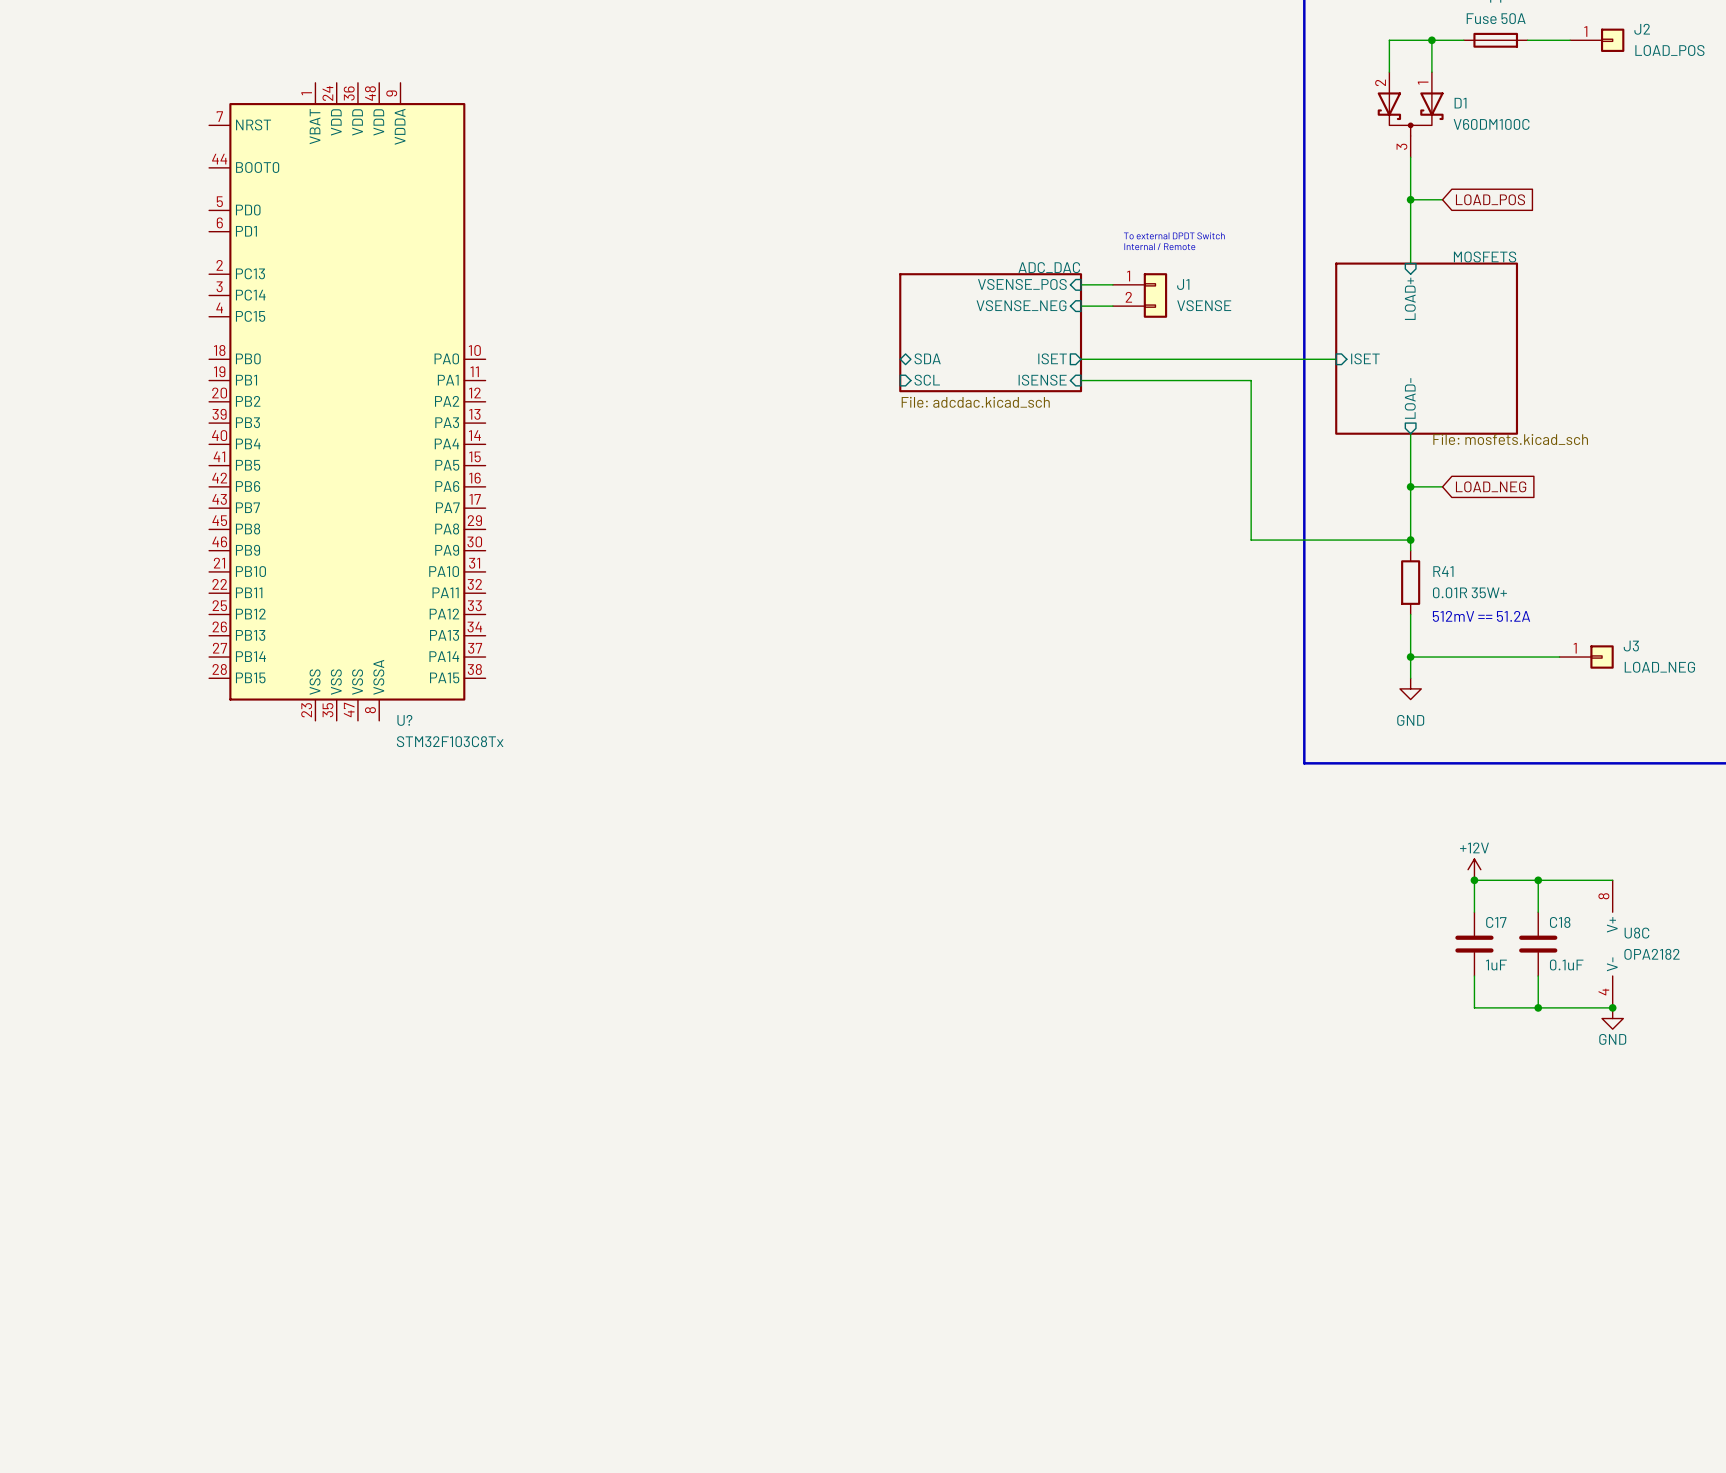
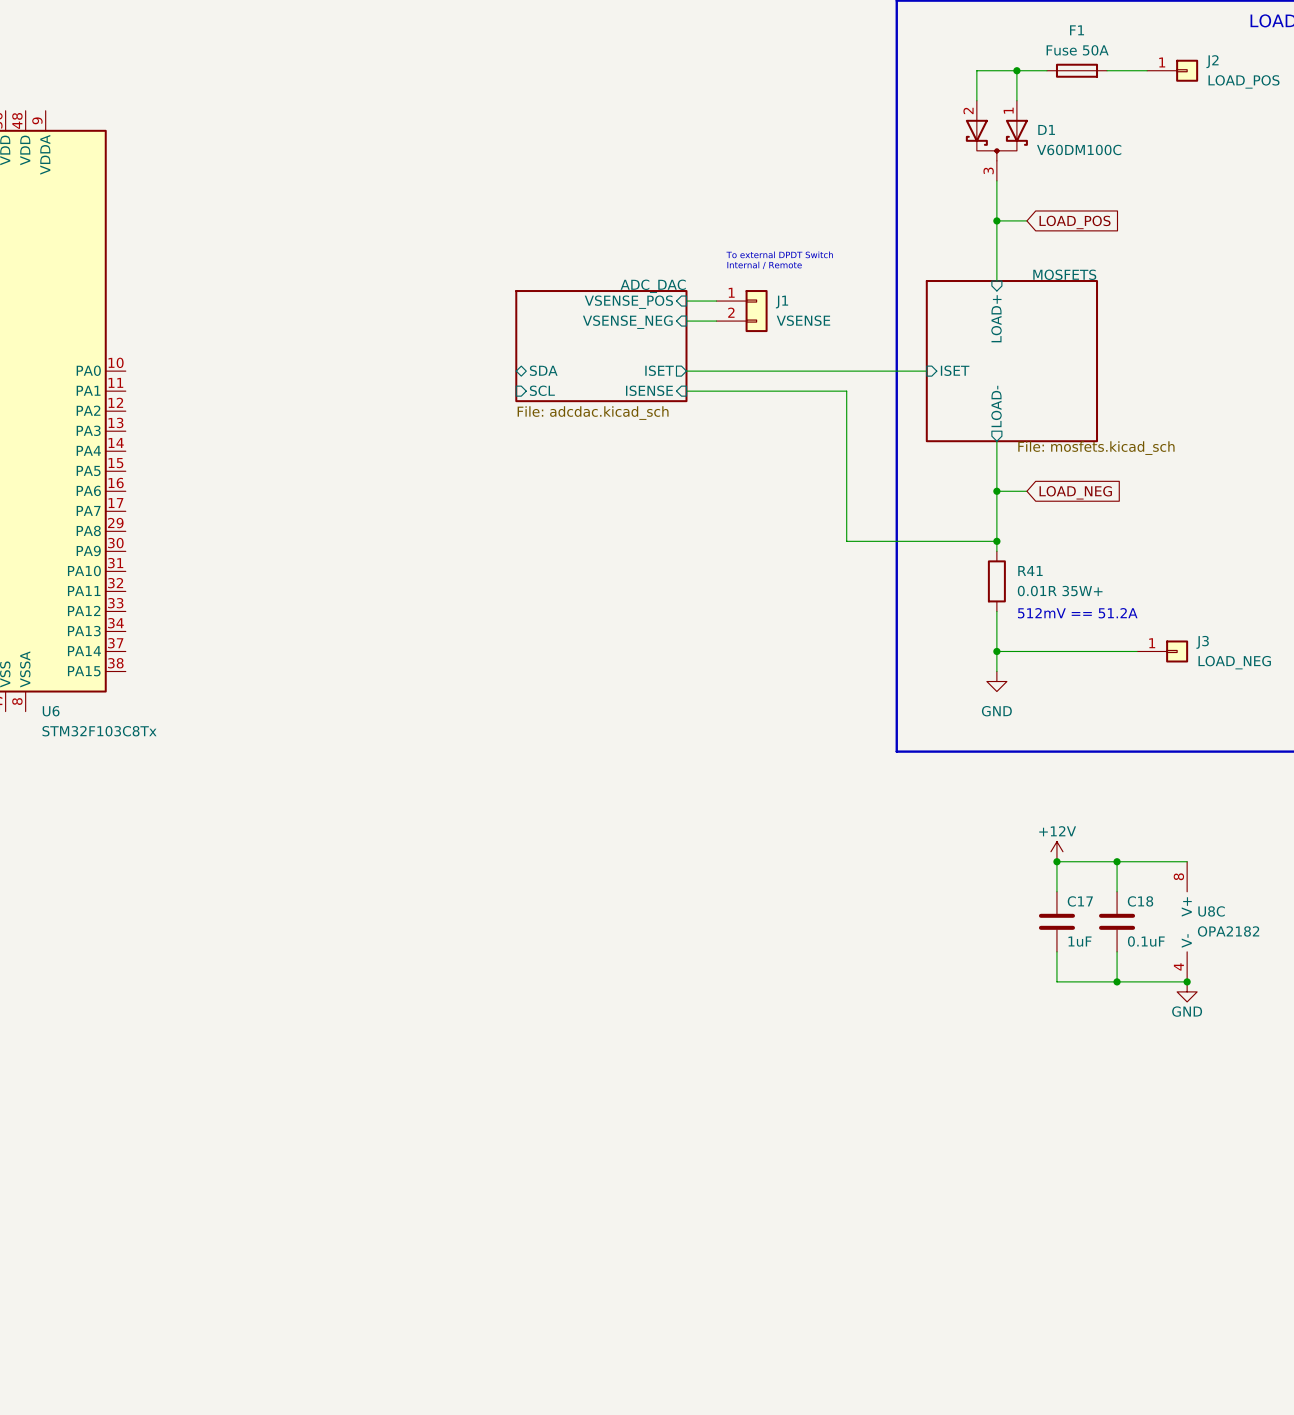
U? name: U? (404, 720) -> U6 (51, 711)

